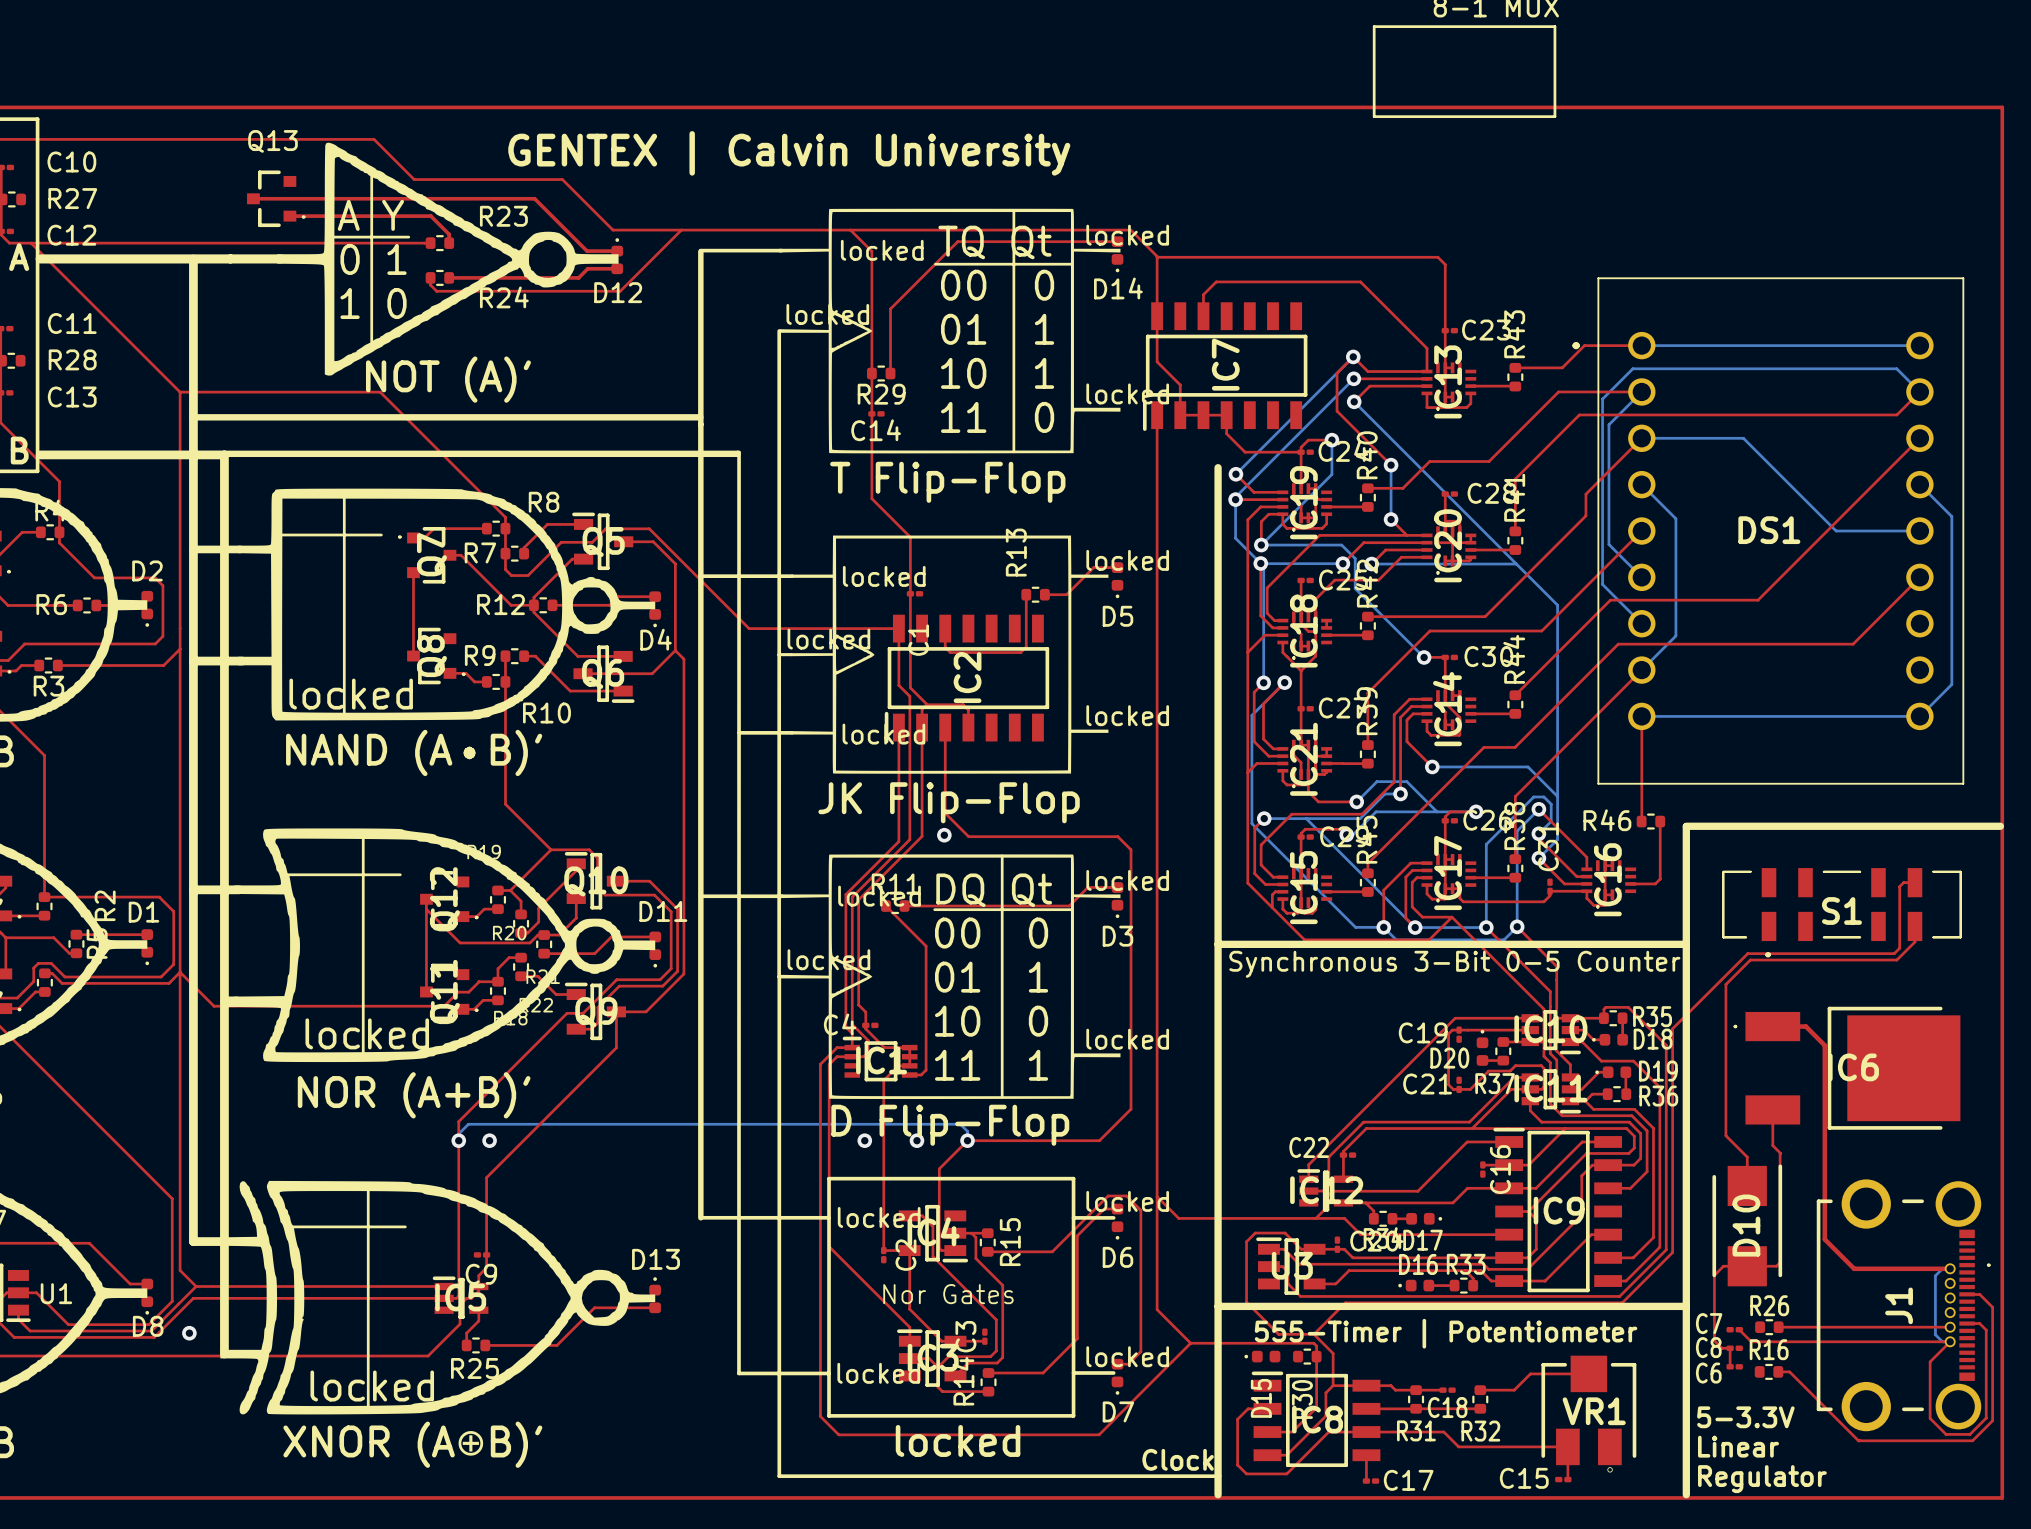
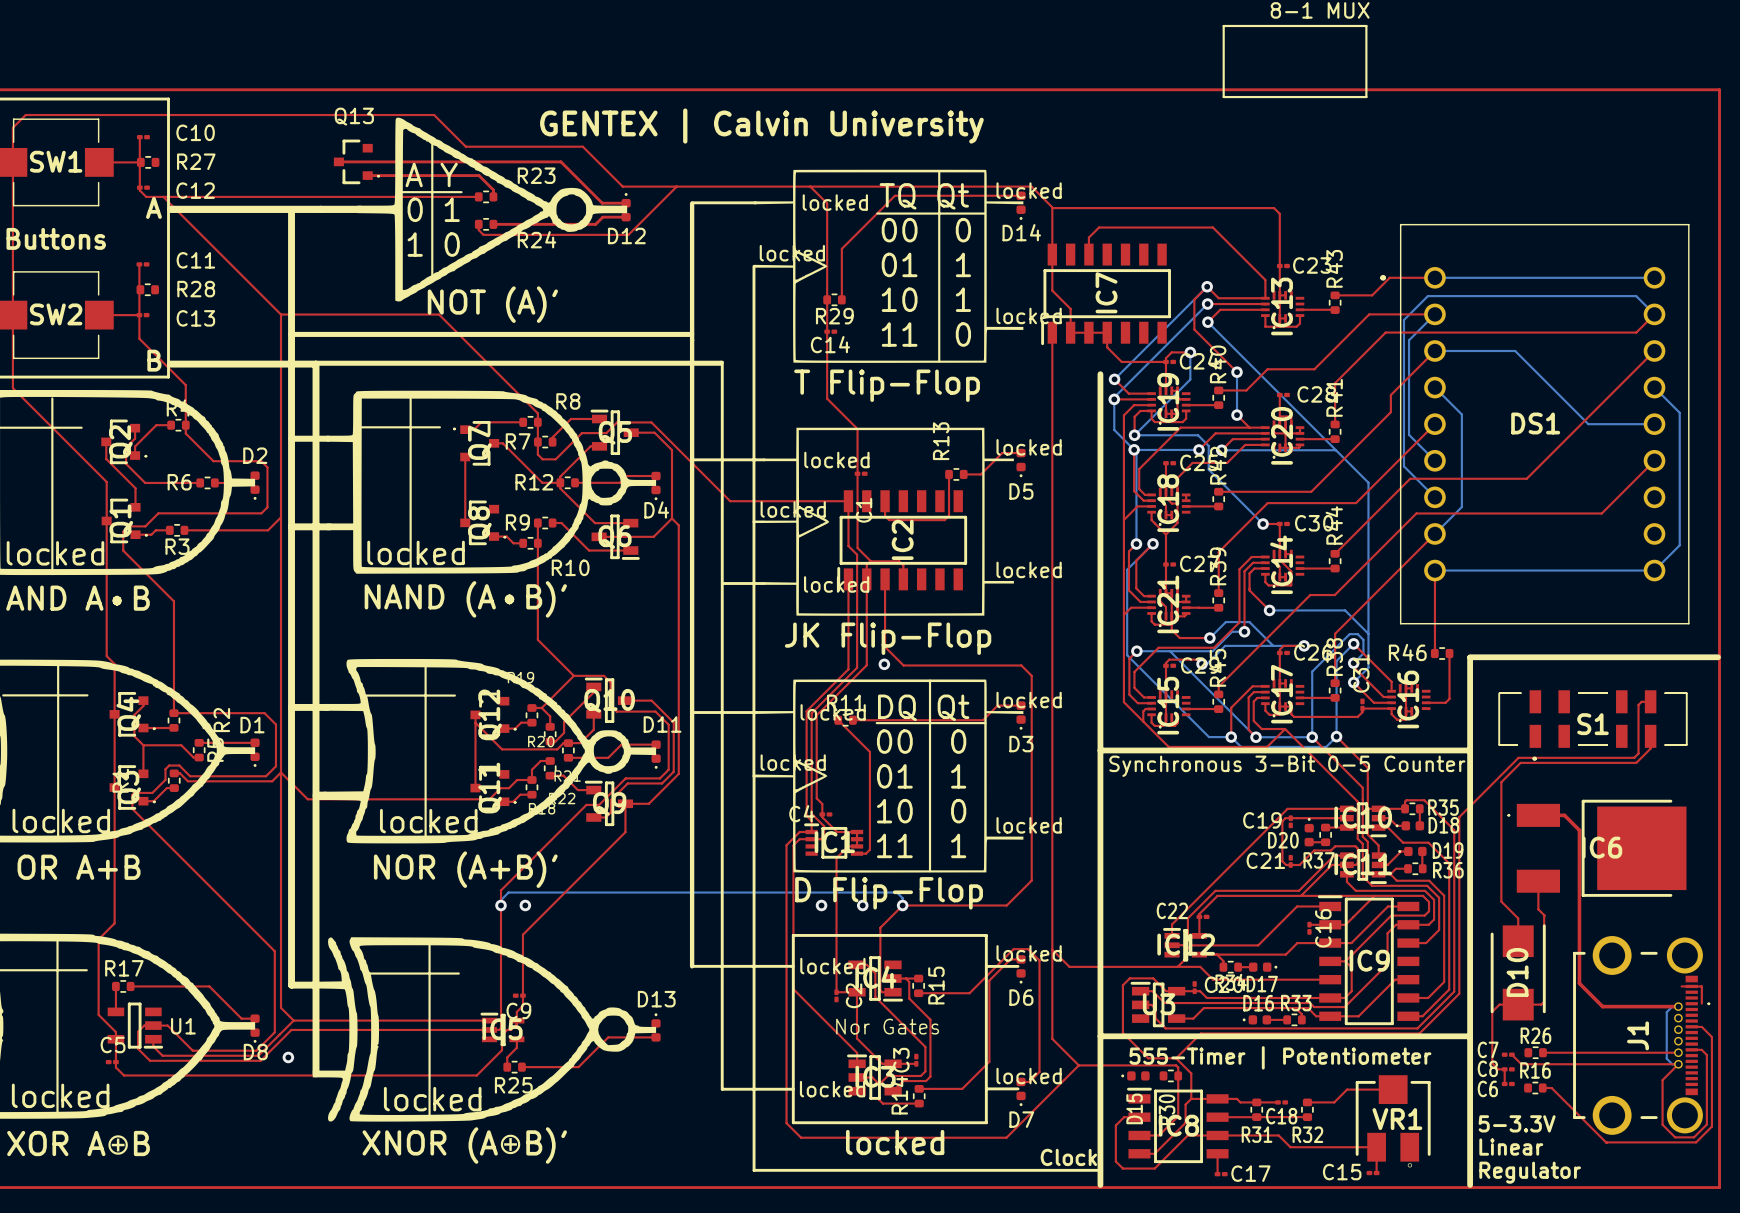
top track: none -> (1681, 986) (1701, 986) (1701, 1003)

